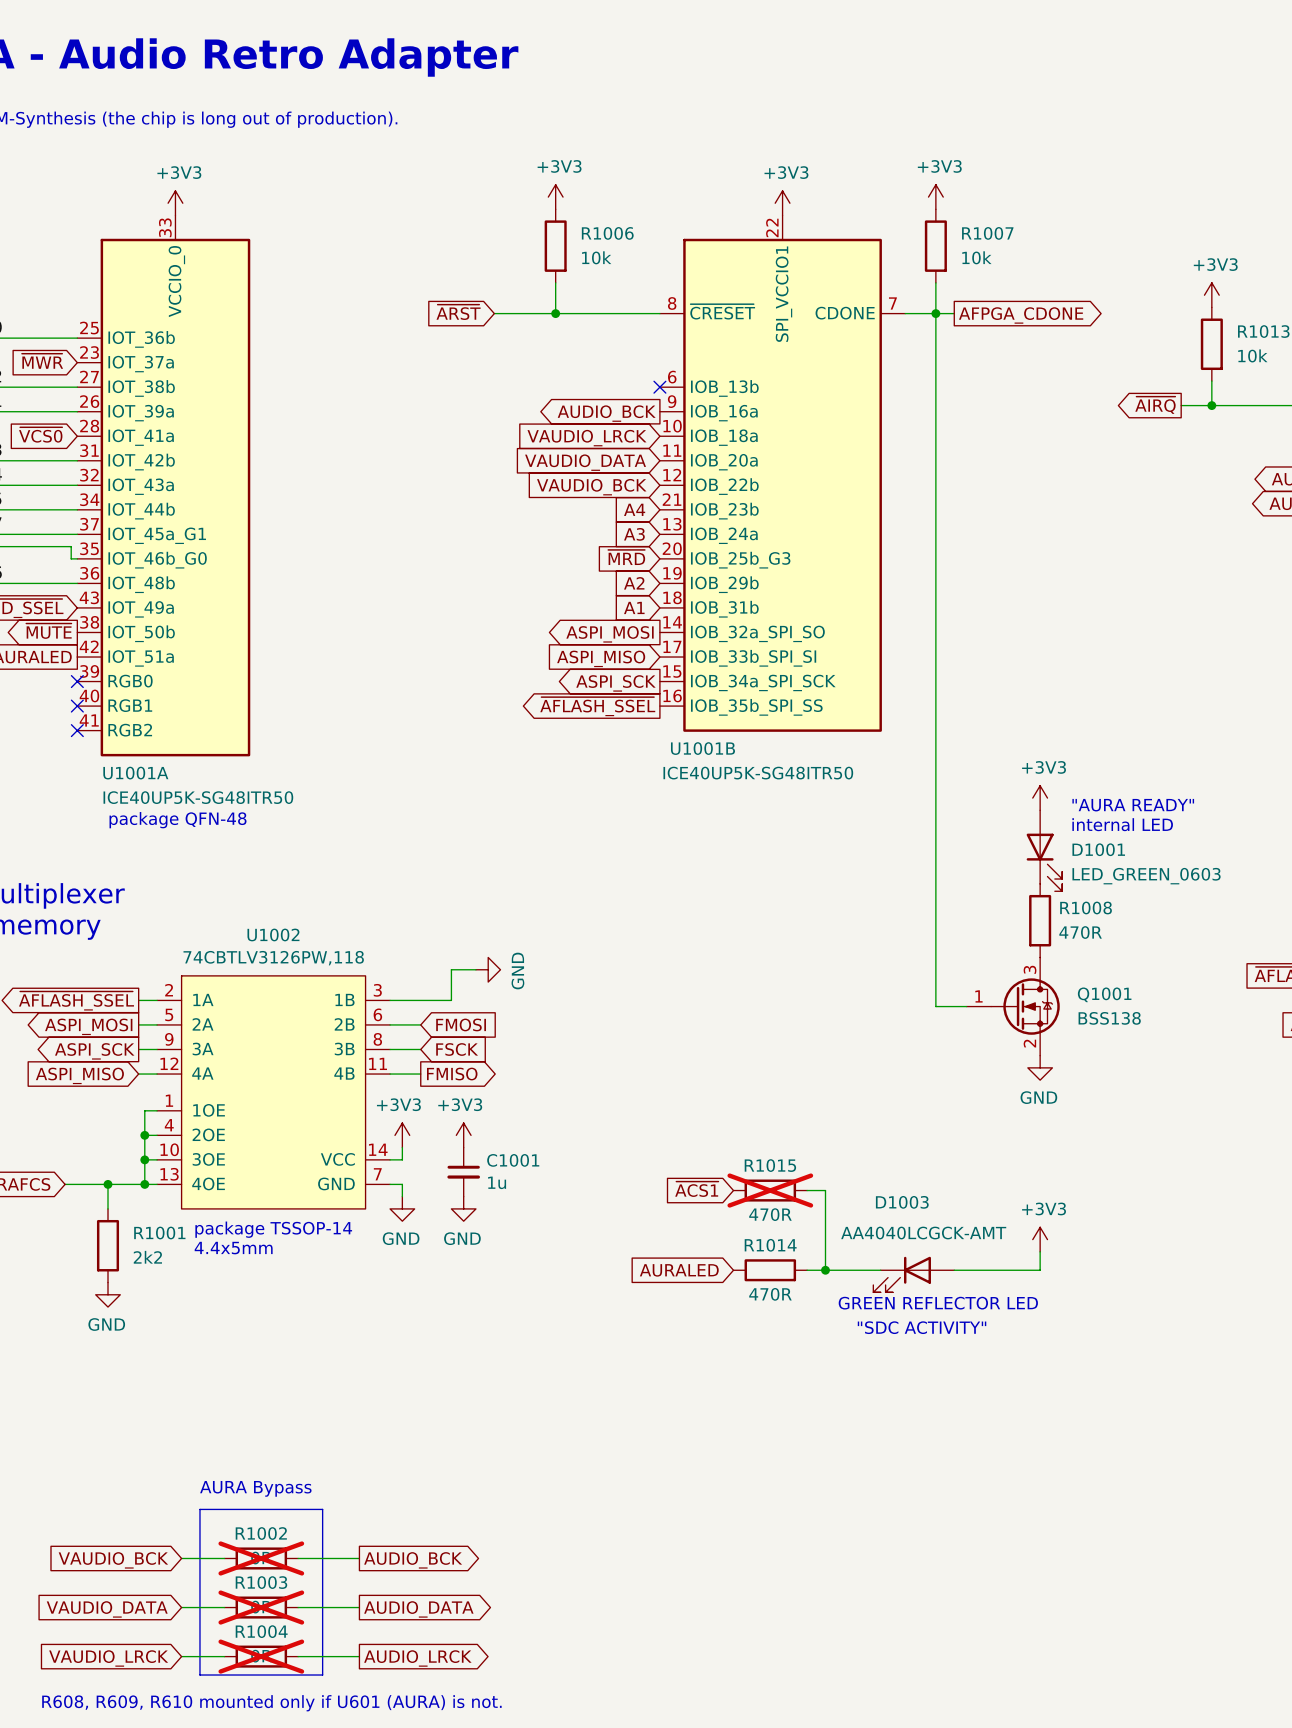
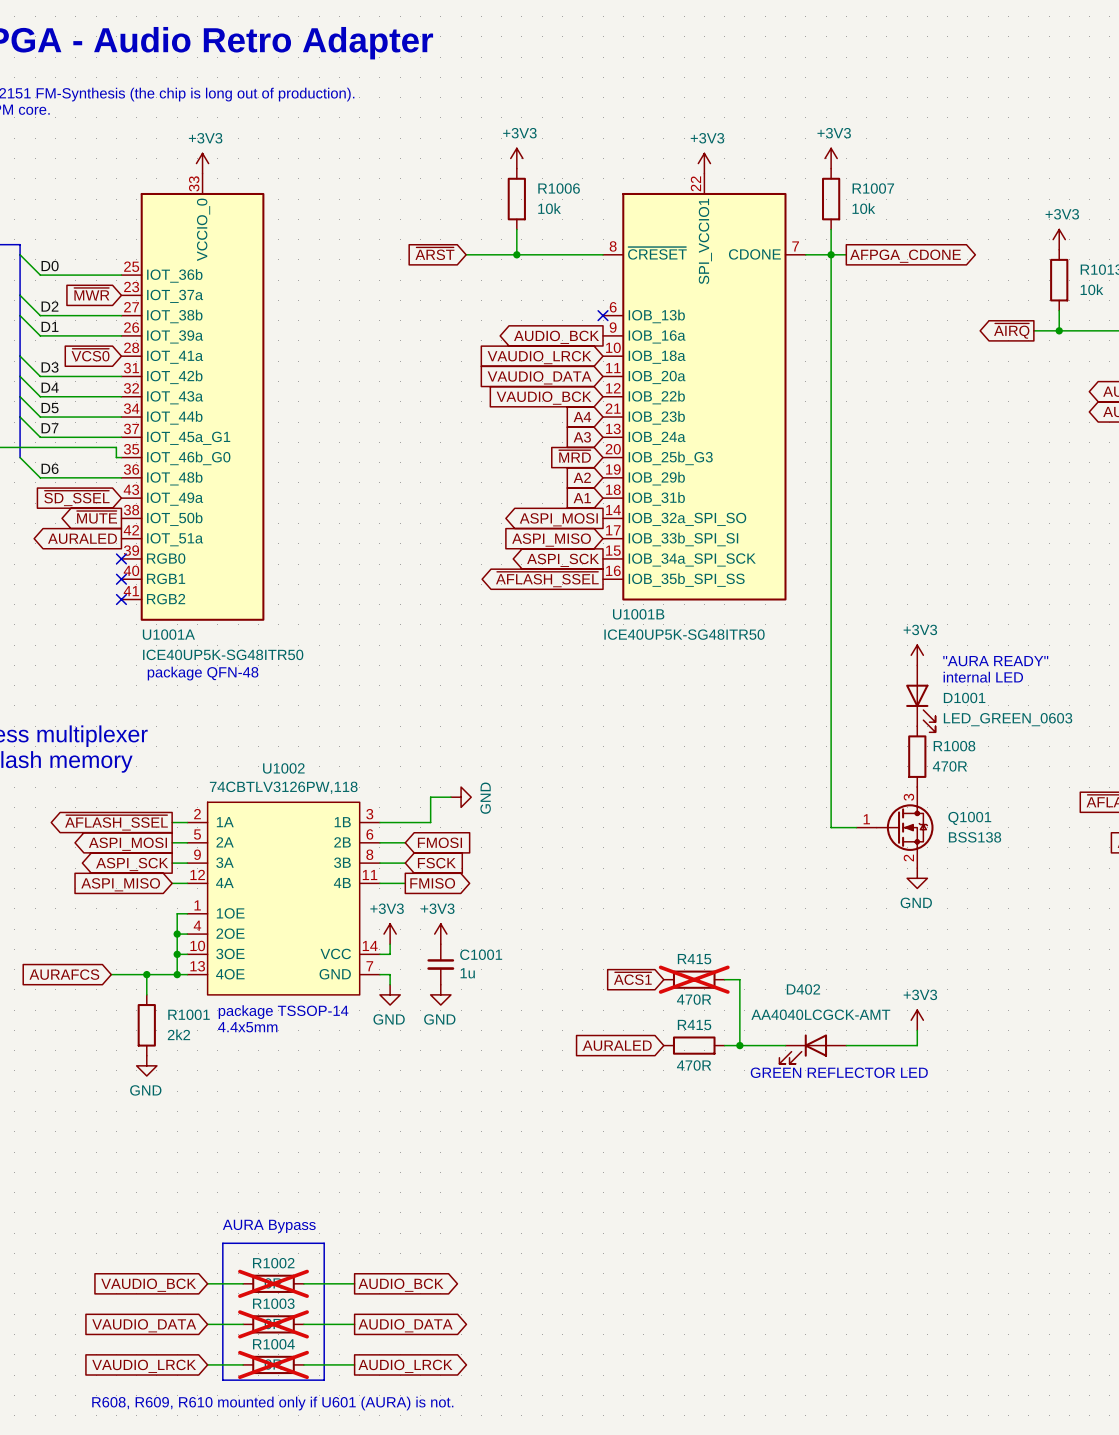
R1015 name: R1015 (770, 1165) -> R415 (694, 959)
D1003 name: D1003 (902, 1202) -> D402 (803, 989)
R1014 name: R1014 (770, 1245) -> R415 (694, 1025)
text: "SDC ACTIVITY" (922, 1327) -> none

